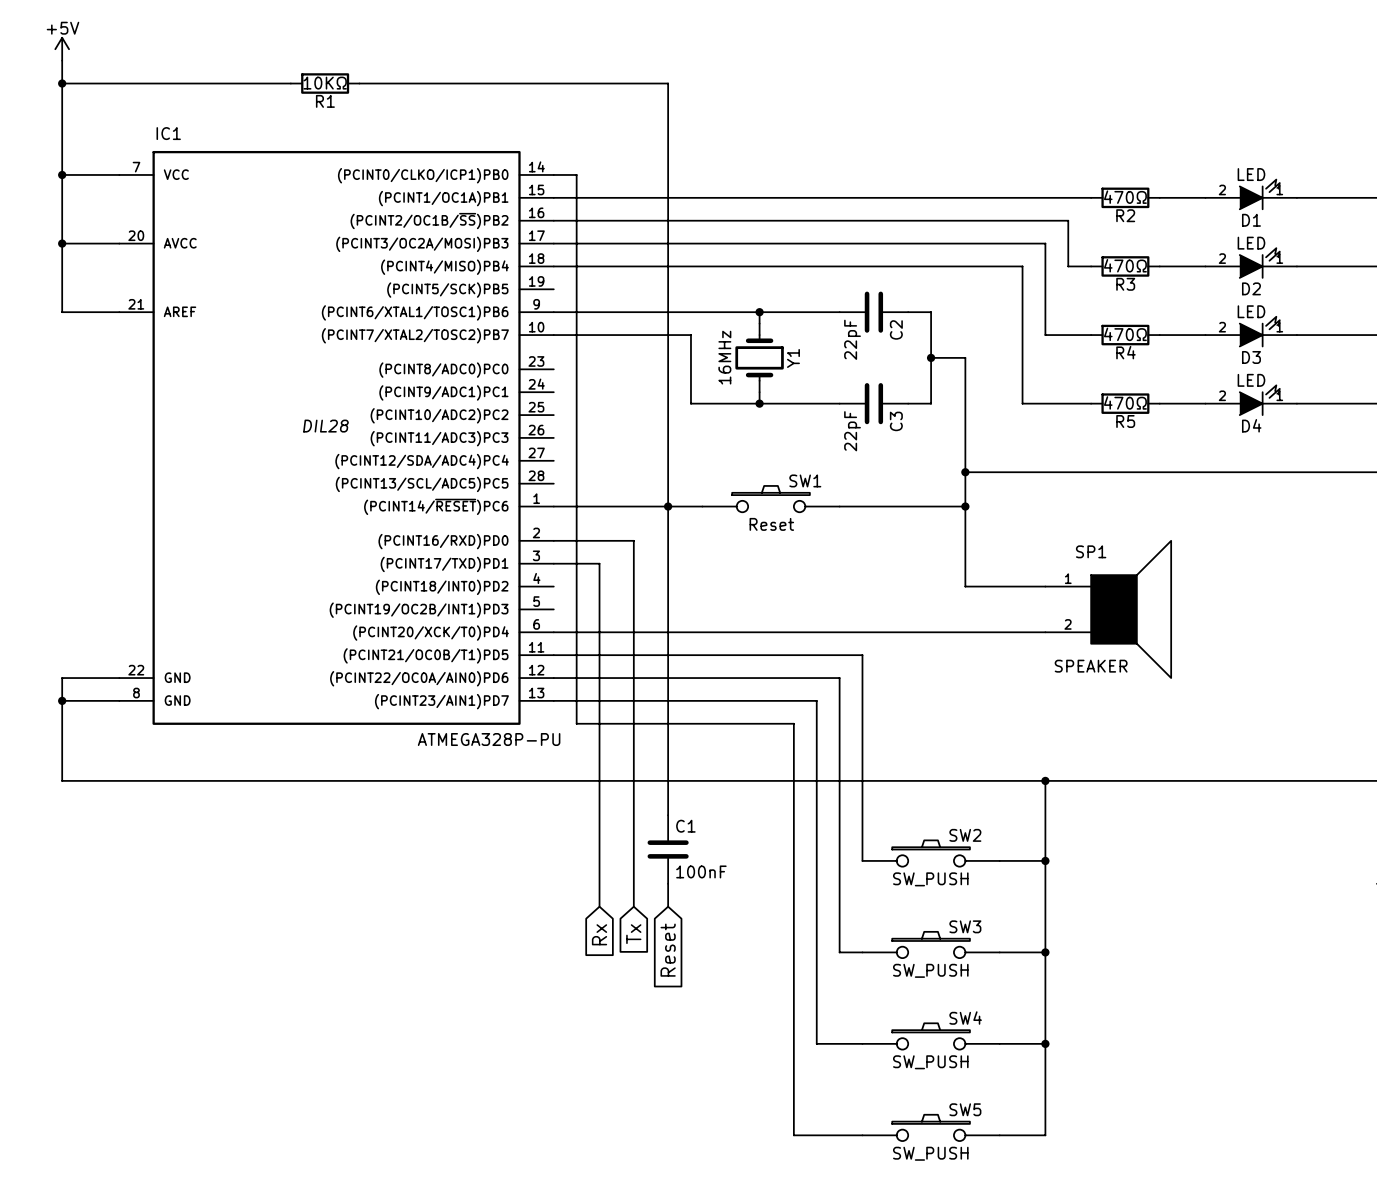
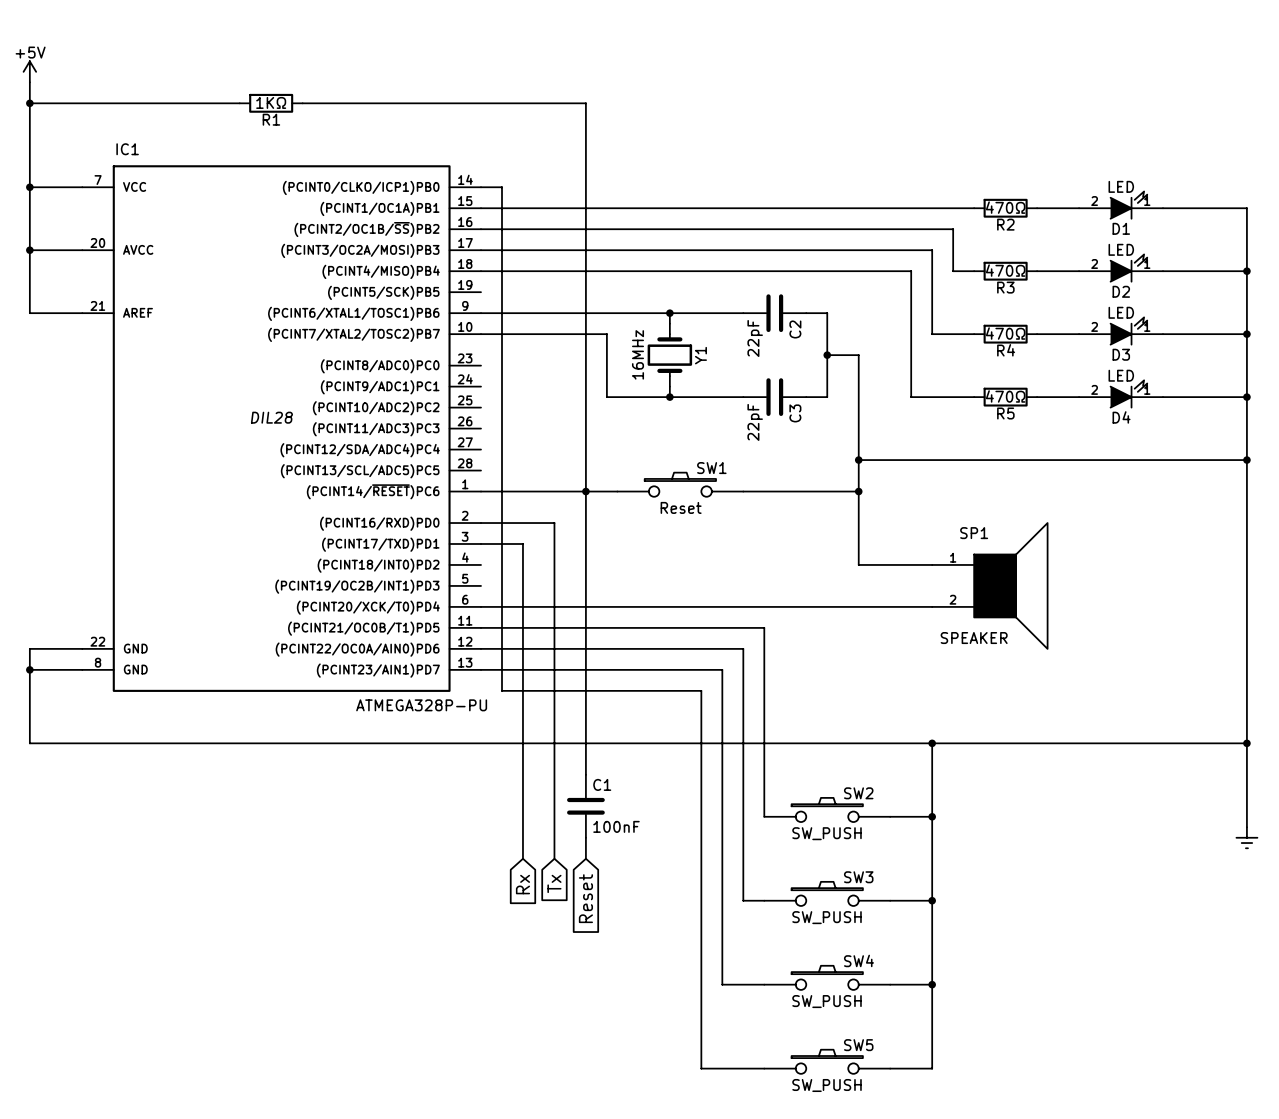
R1 value: 10KΩ (325, 83) -> 1KΩ (271, 102)

